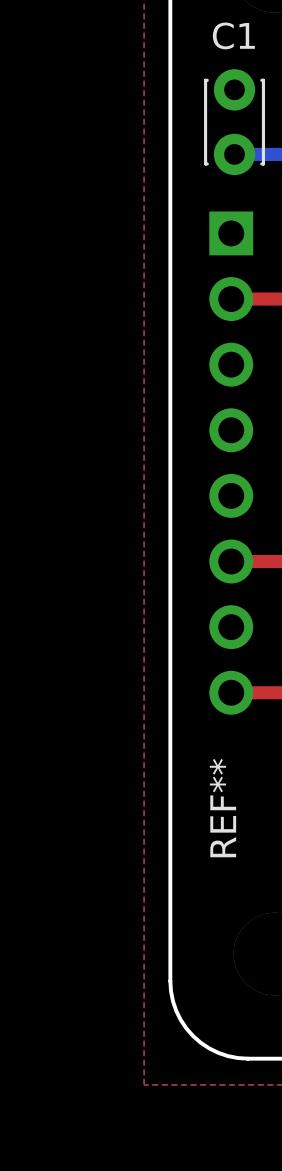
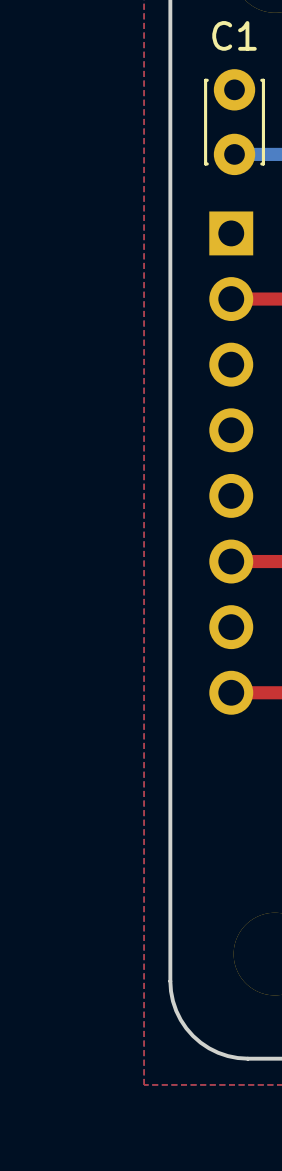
REF** name: REF** (222, 808) -> none

